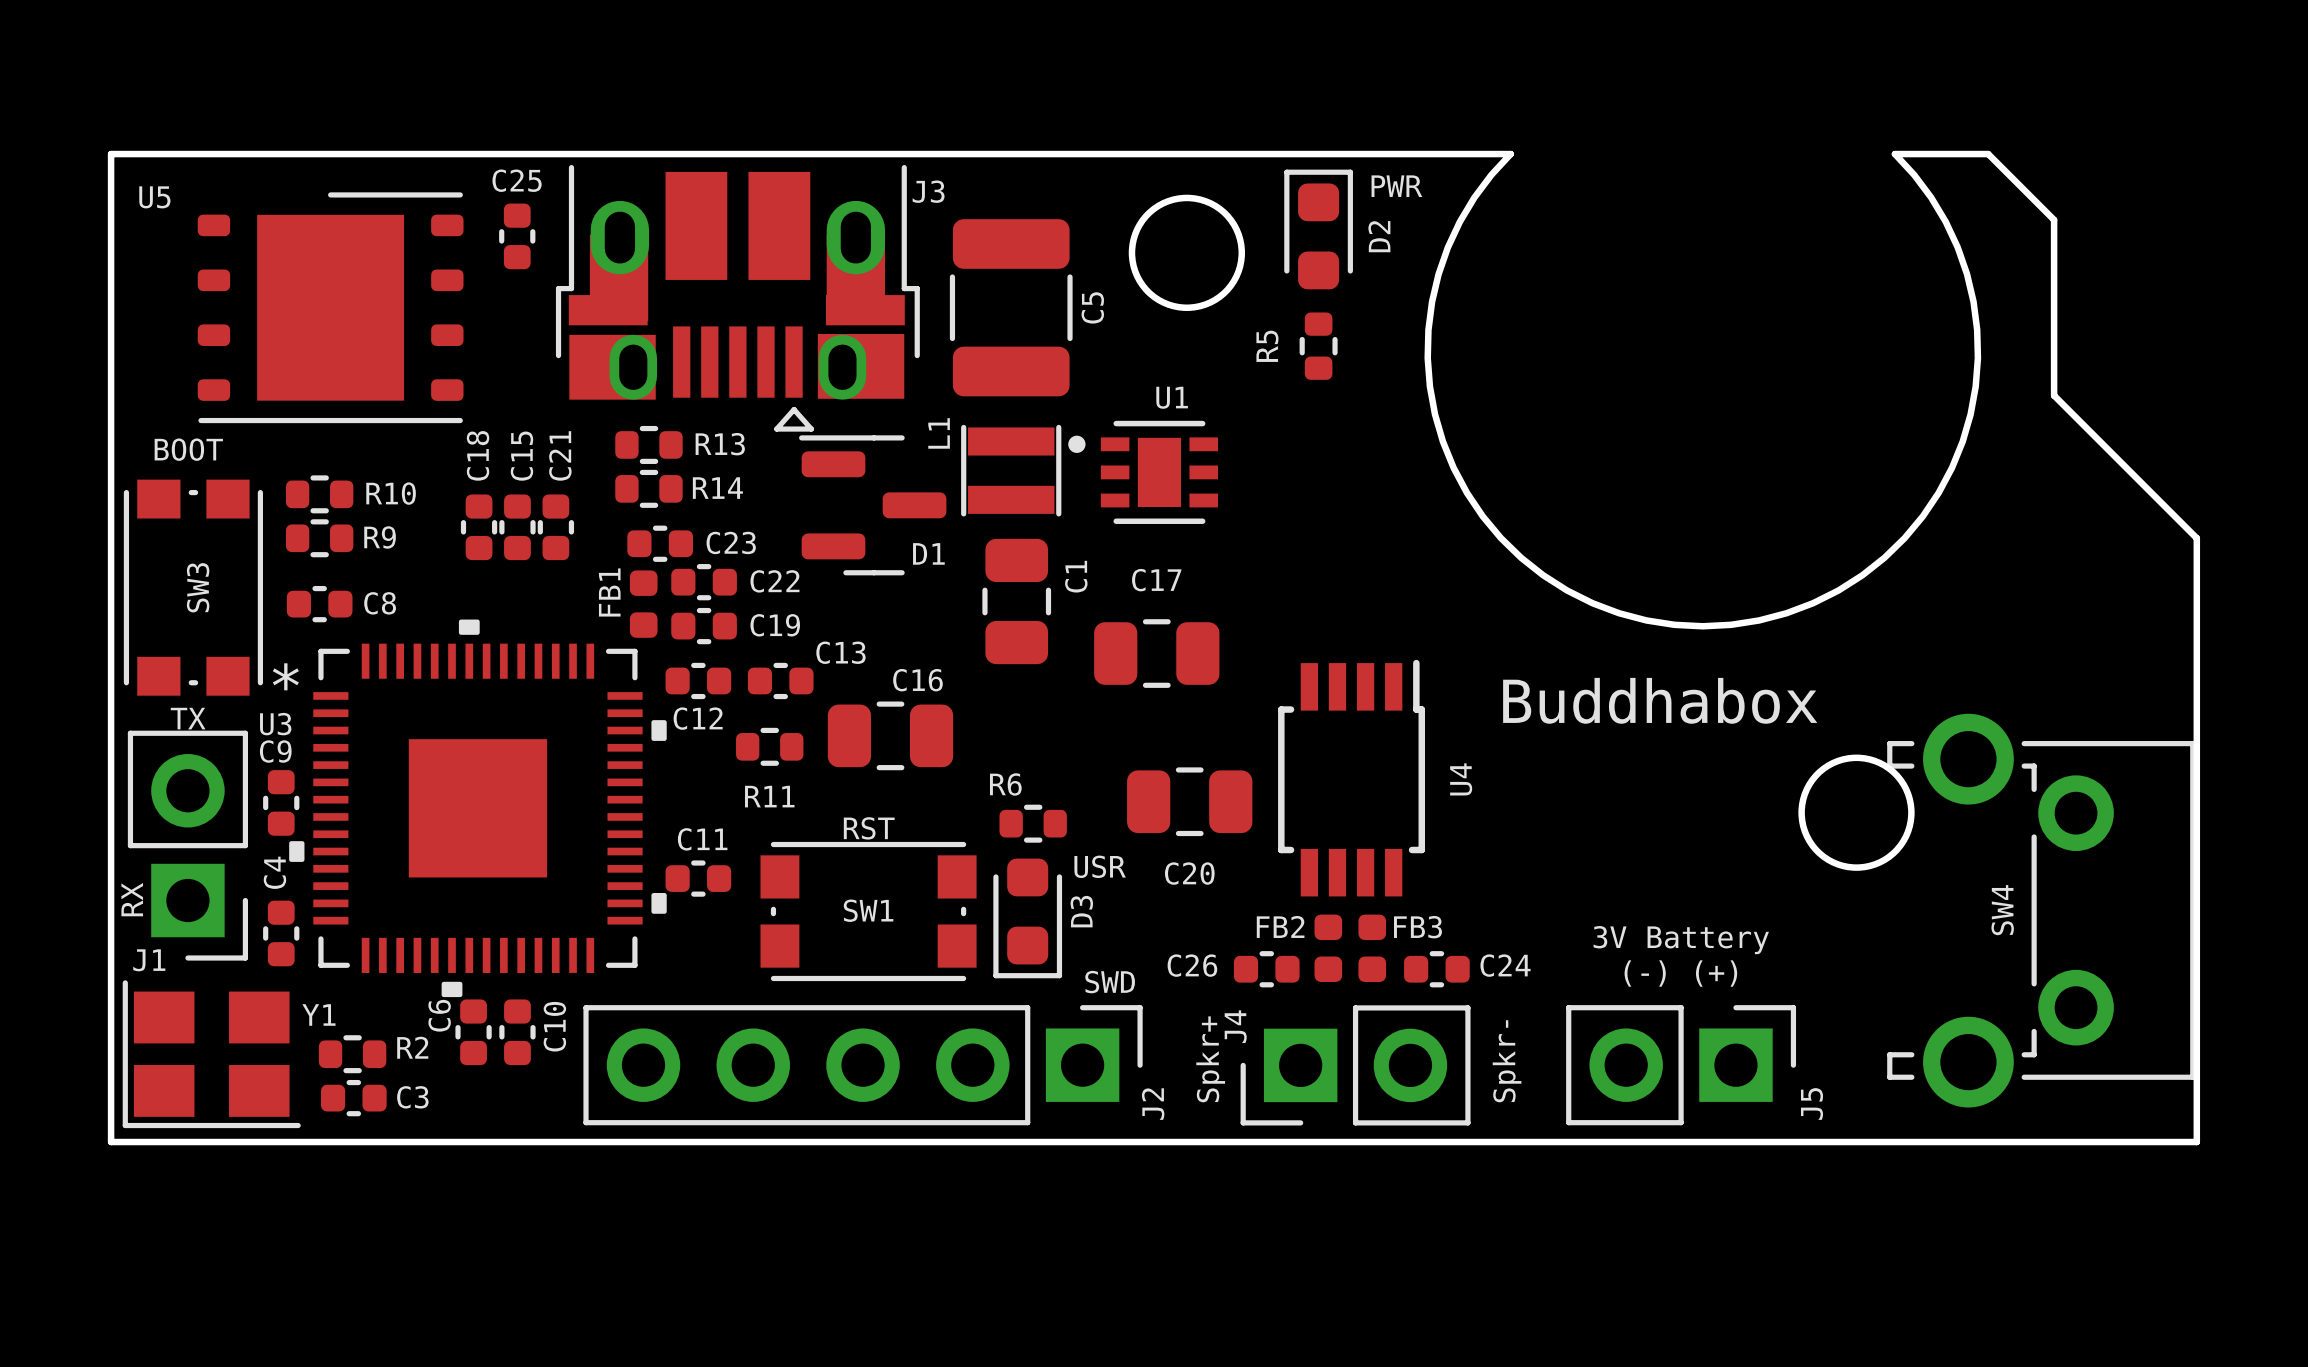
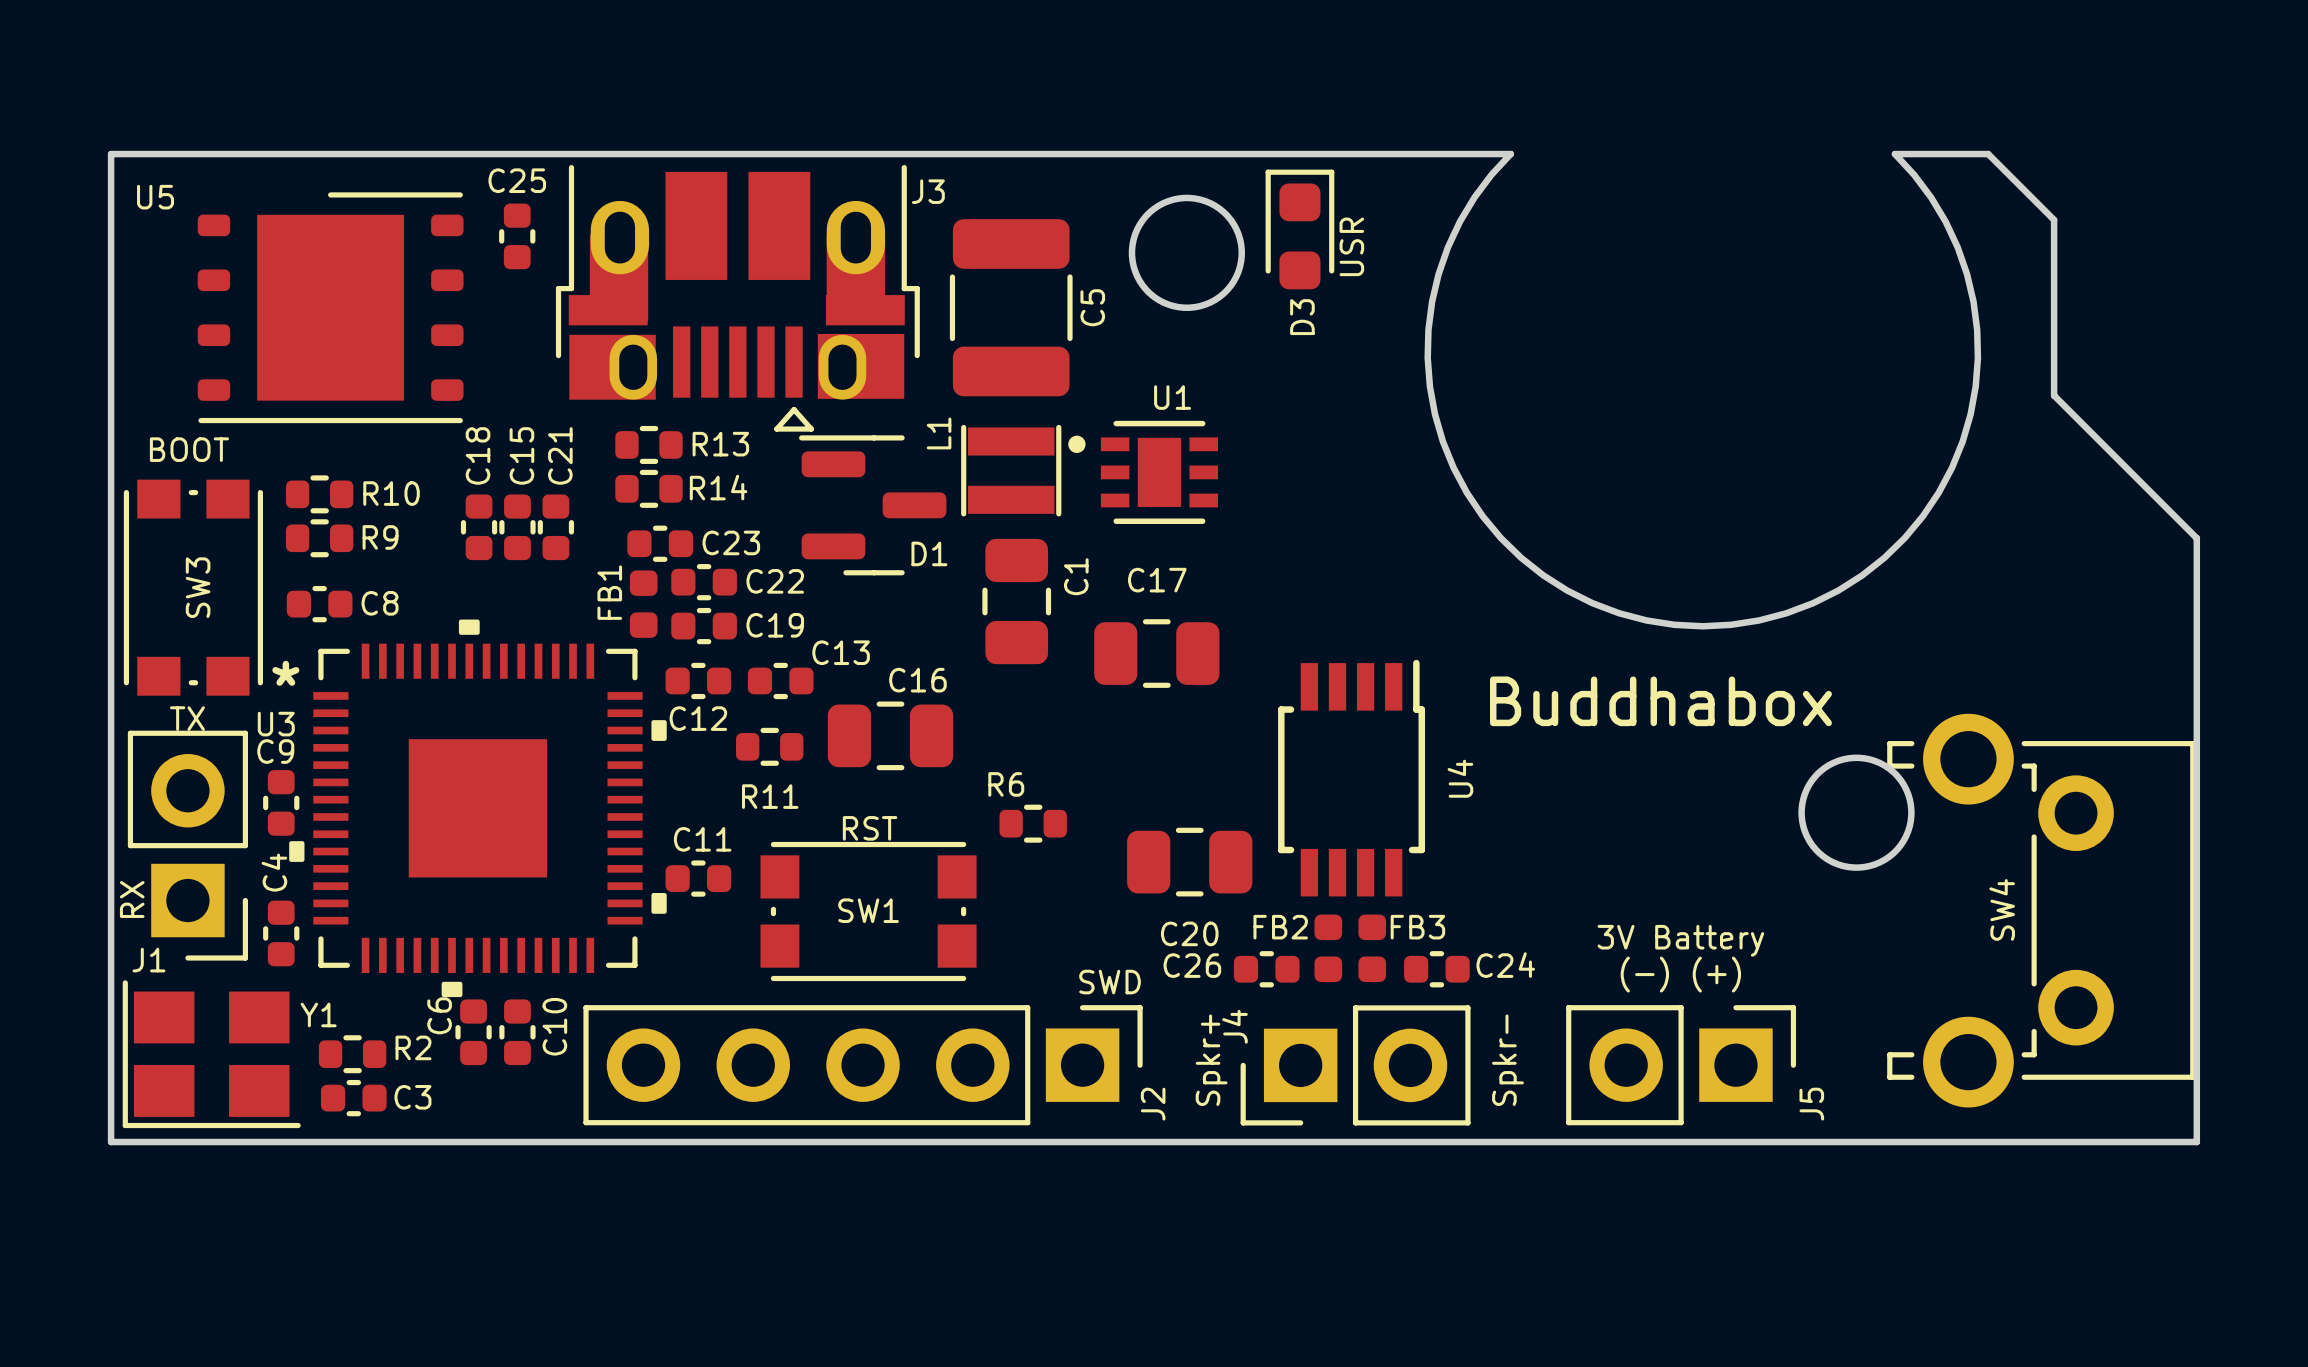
text: PWR (1396, 186) -> none
D2: (1318, 229) -> none
R5: (1318, 346) -> none
C20 position: (1189, 801) -> (1189, 862)
text rotation: 0° (1100, 866) -> 90° counterclockwise (1351, 246)
text position: USR (1100, 866) -> USR (1351, 246)
D3 name position: D3 (1081, 911) -> D3 (1302, 317)
D3 rotation: 0° (1027, 918) -> 180° (1299, 229)
D3 position: (1027, 918) -> (1299, 229)

